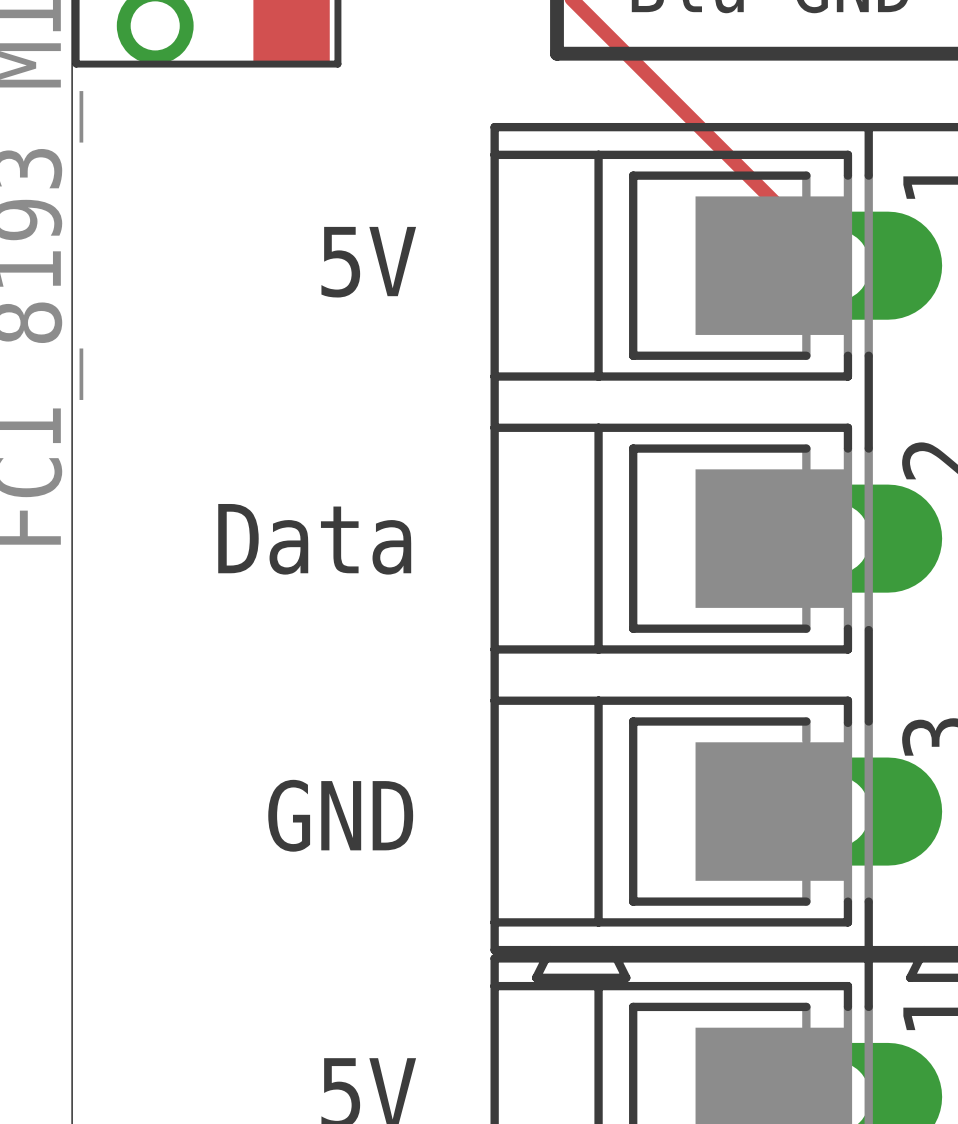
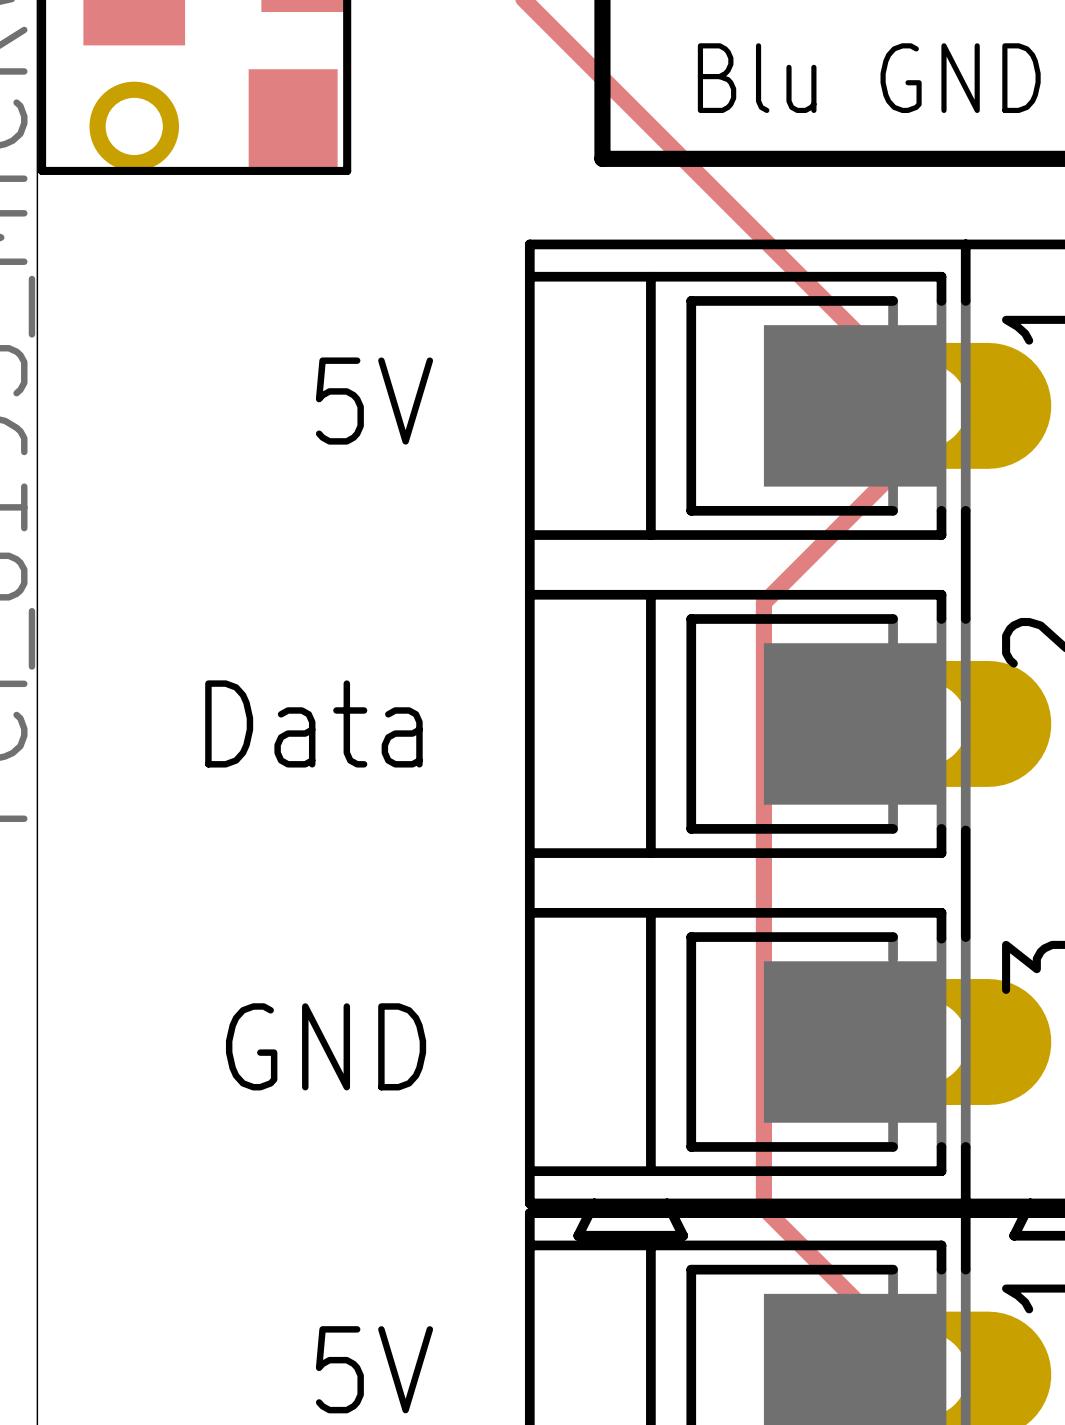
track: none -> (925, 405) (925, 441) (763, 602) (763, 1208) (925, 1369) (925, 1374)

